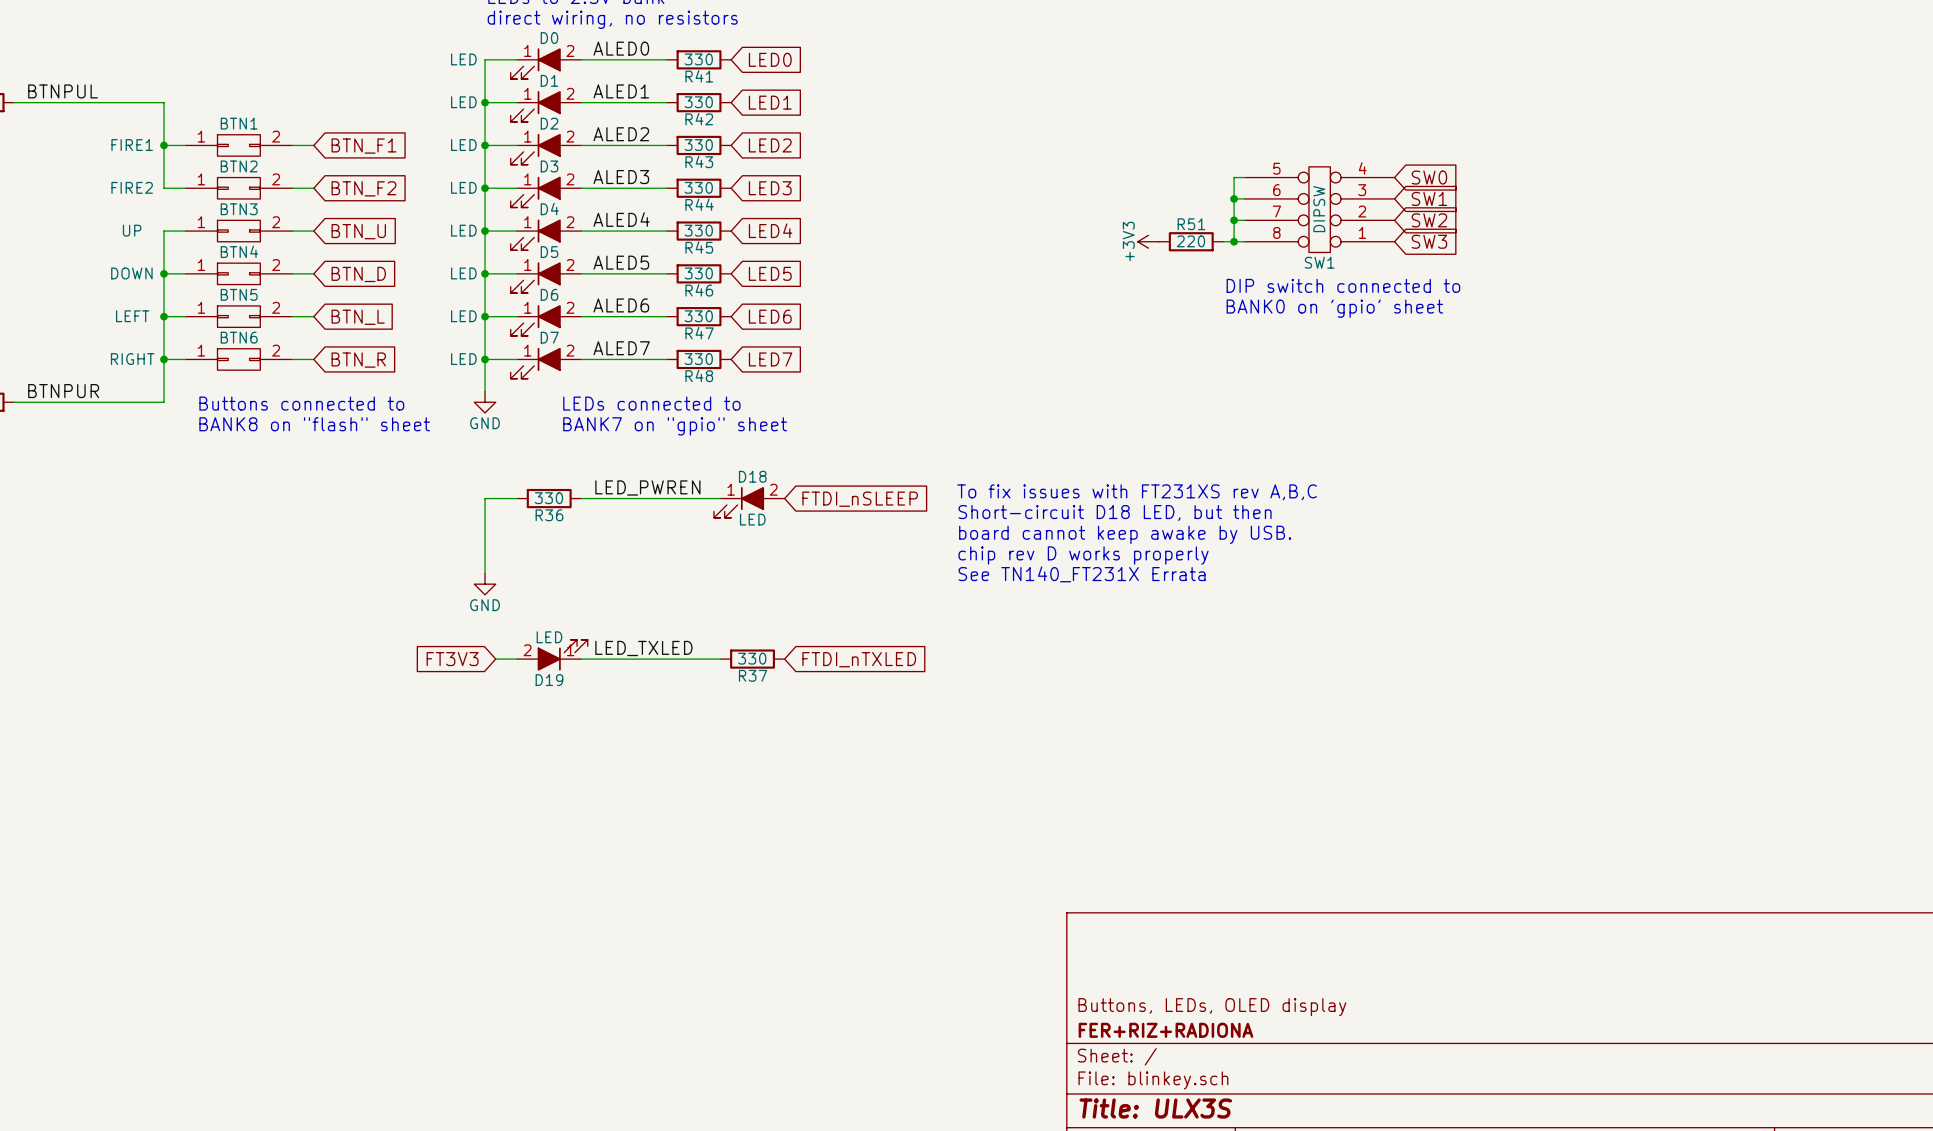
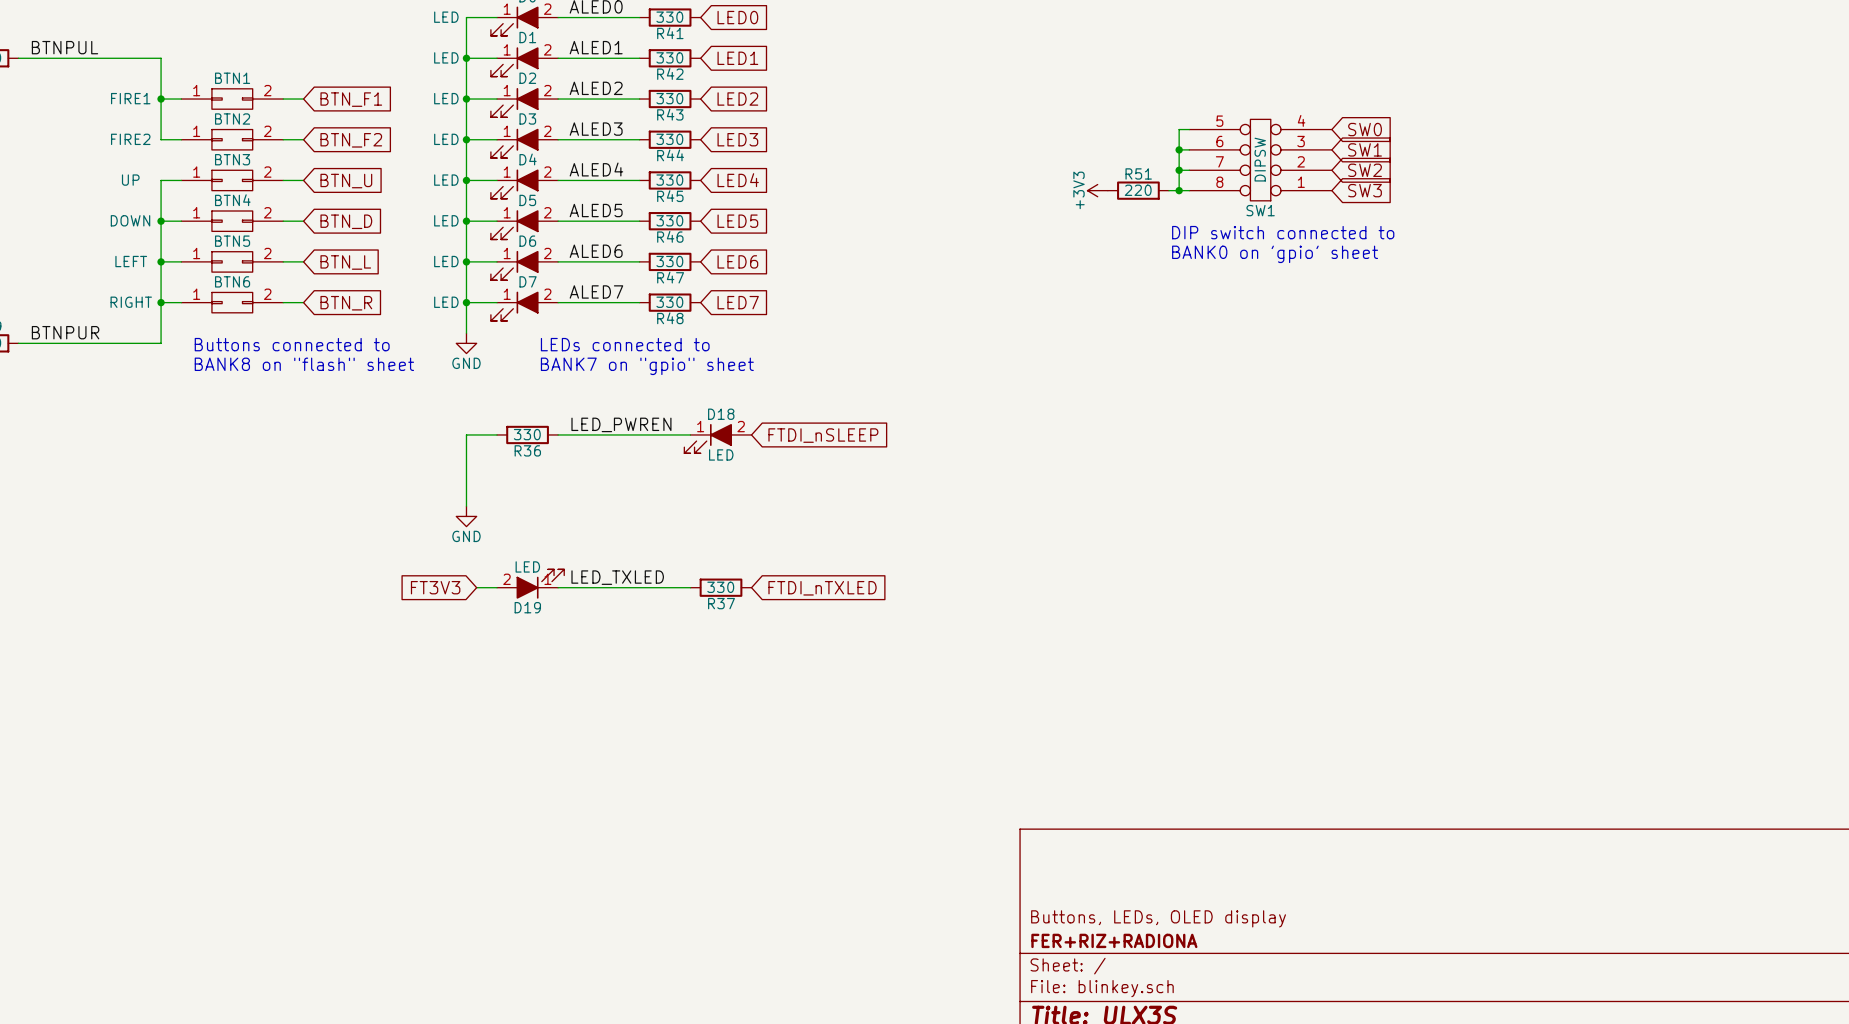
text: To fix issues with FT231XS rev A,B,C (1137, 492) -> none
text: Short-circuit D18 LED, but then (1115, 512) -> none
text: board cannot keep awake by USB. (1125, 534) -> none
text: chip rev D works properly (1083, 555) -> none
text: See TN140_FT231X Errata (1082, 574) -> none

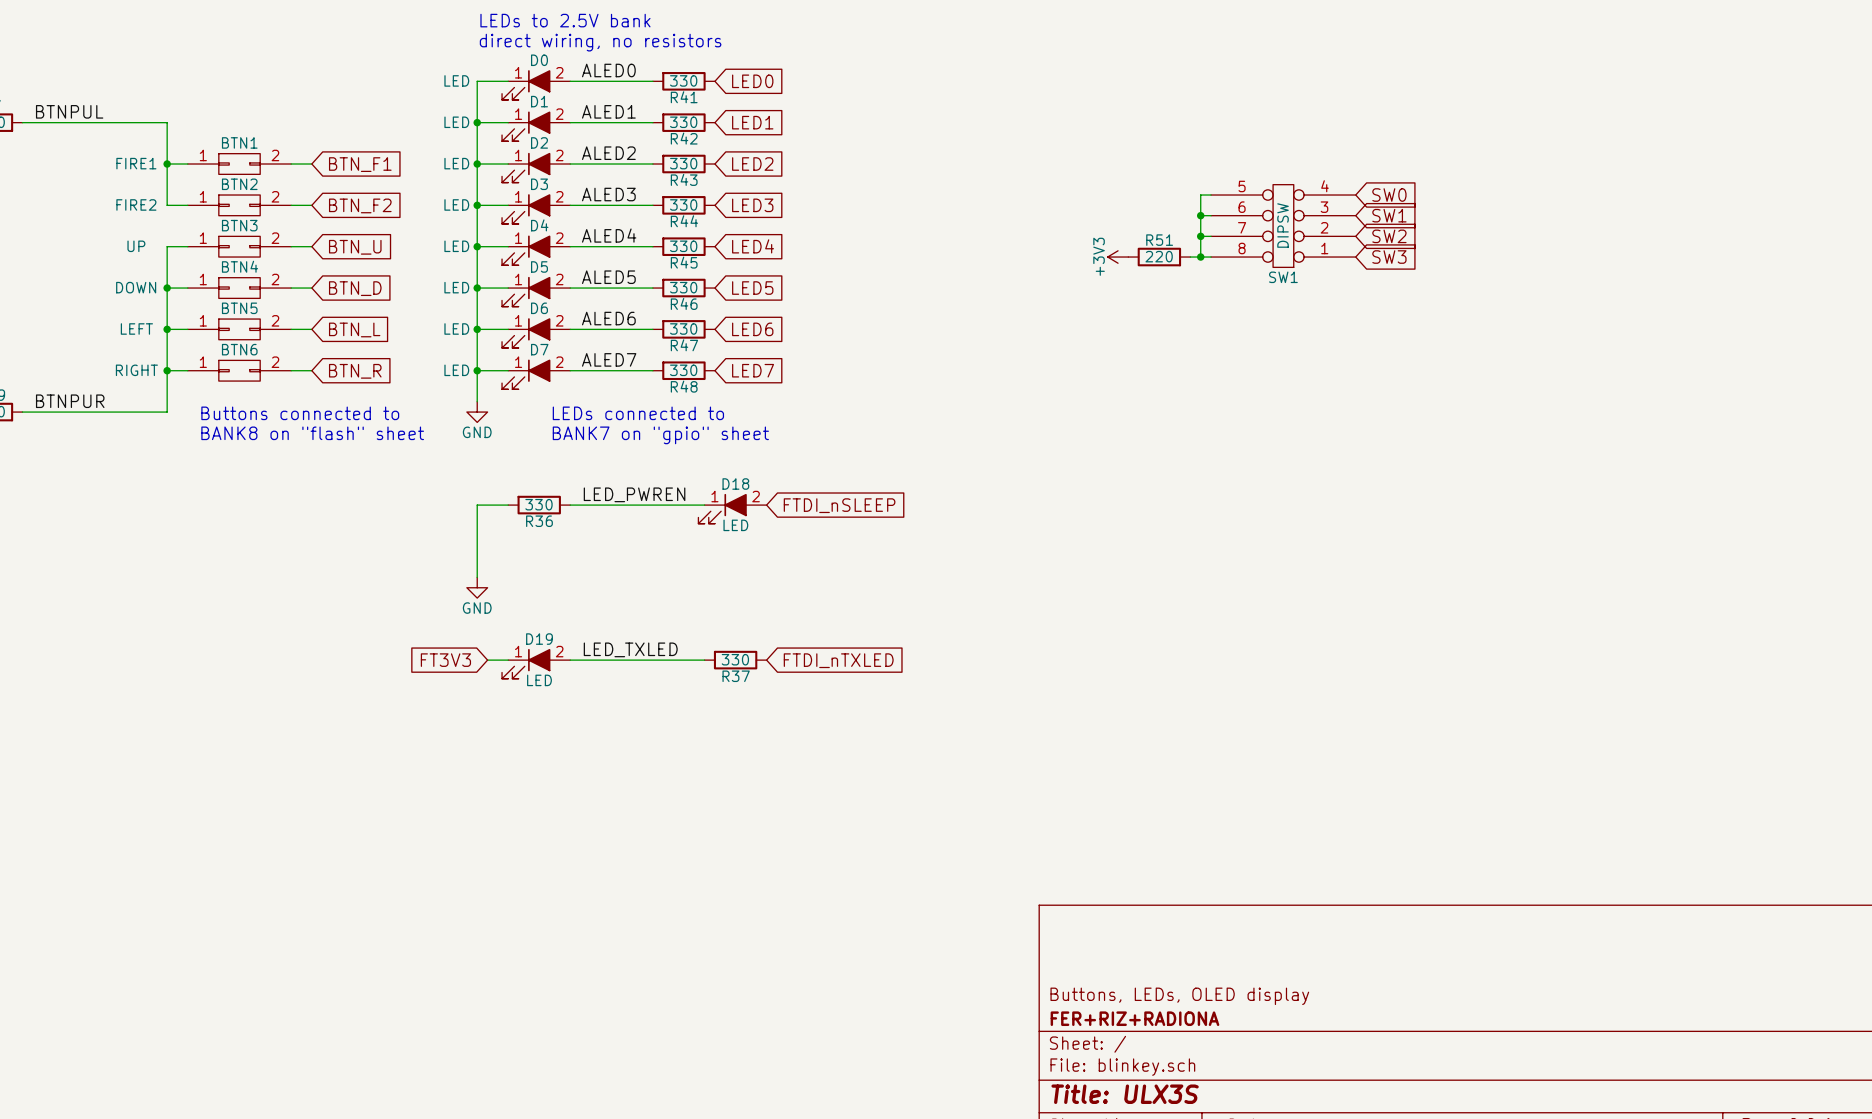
text: DIP switch connected to (1283, 232) -> none
text: BANK0 on 'gpio' sheet (1275, 254) -> none
D19 rotation: 0° (540, 584) -> 180° (526, 663)

